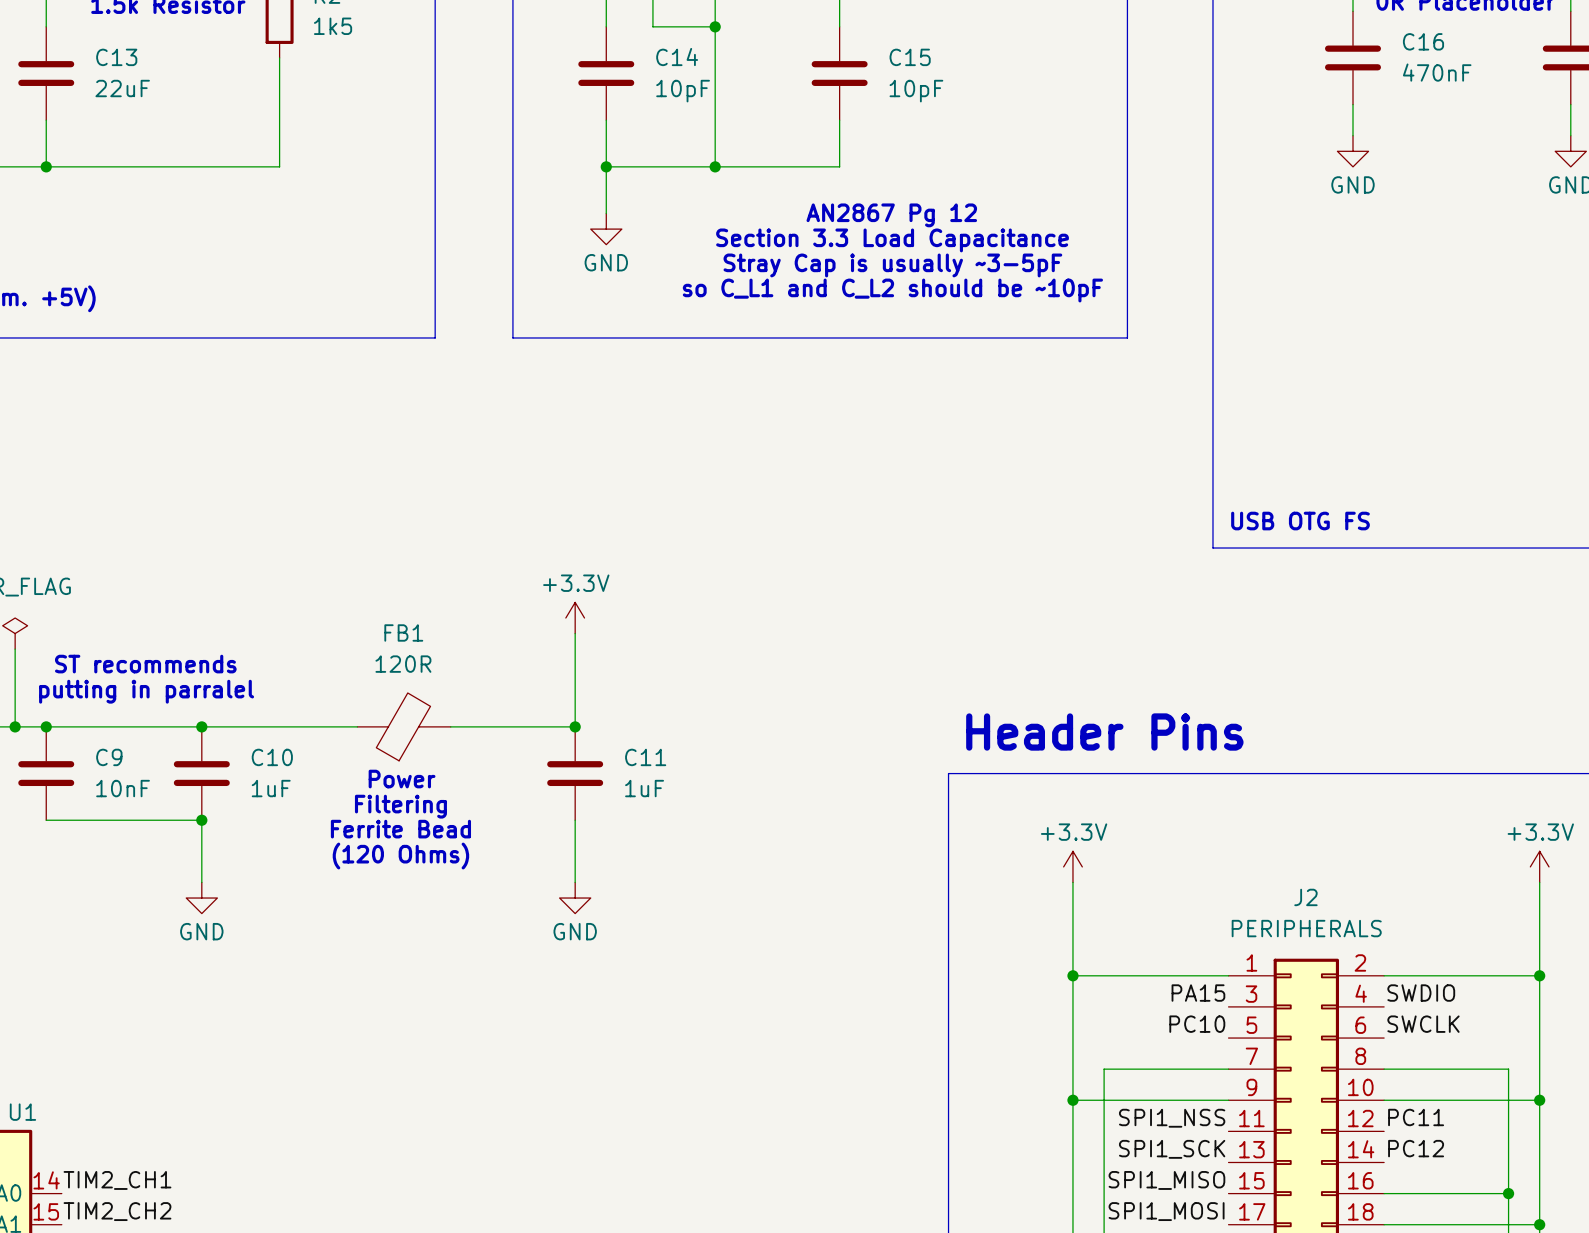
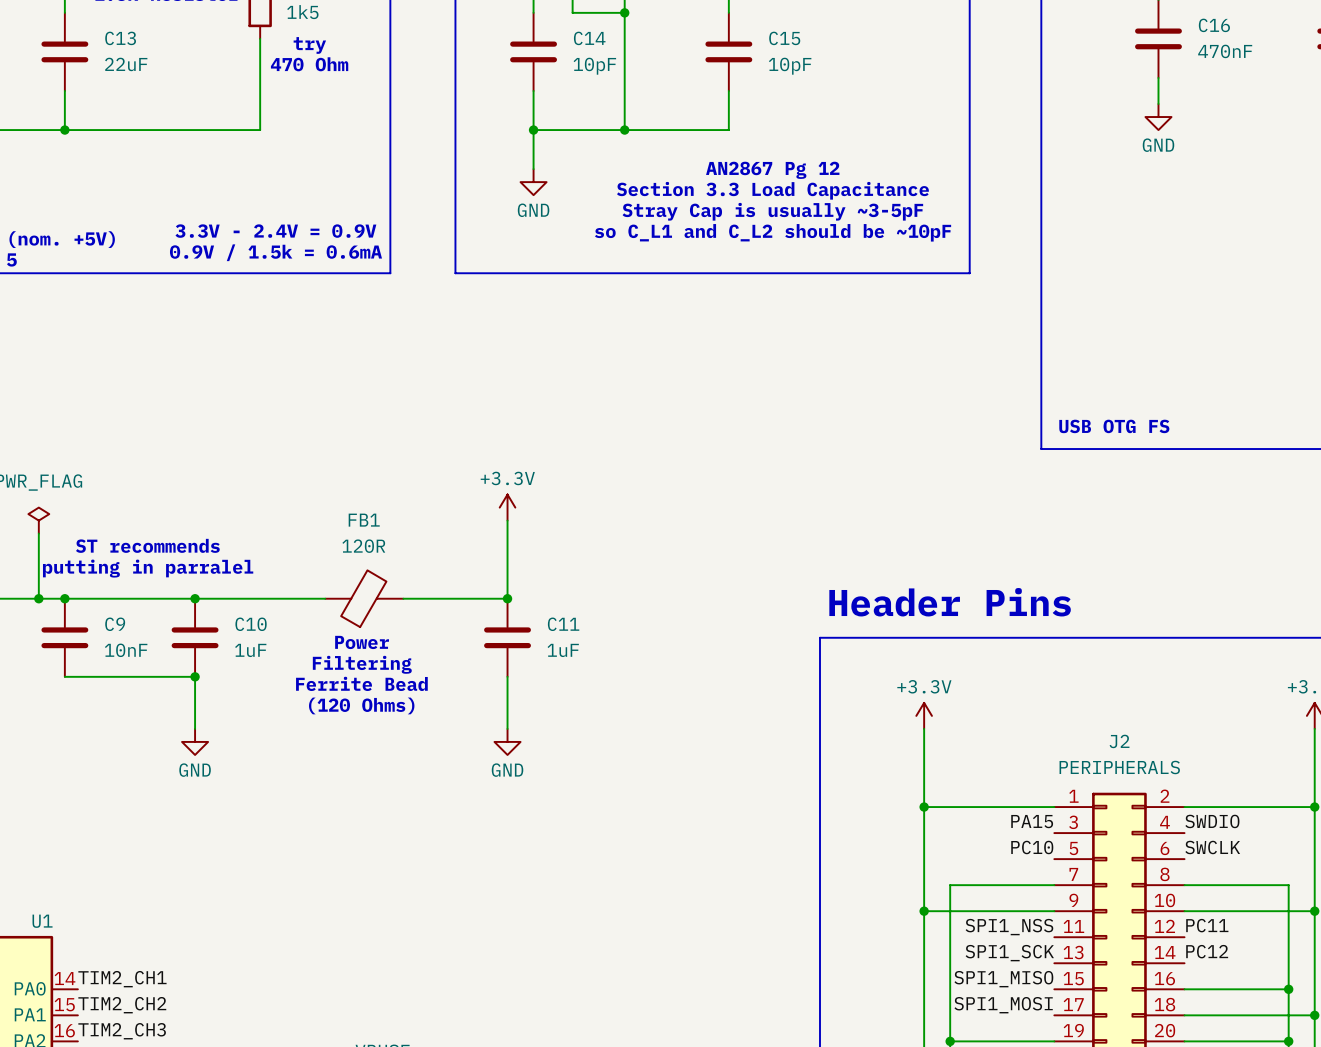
text: none -> try (309, 45)
text: none -> 470 Ohm (309, 64)
text: none -> 3.3V - 2.4V = 0.9V (275, 231)
text: none -> 0.9V / 1.5k = 0.6mA (275, 252)

